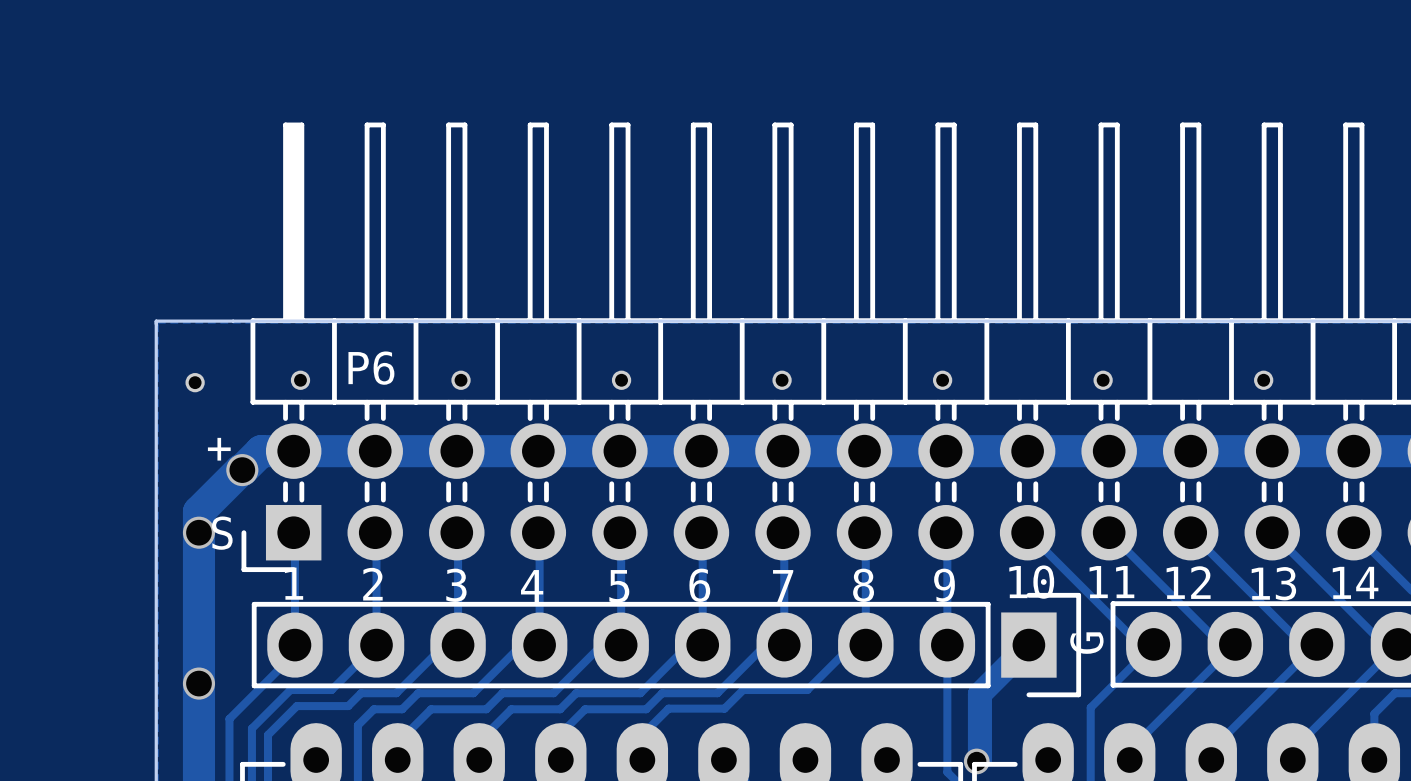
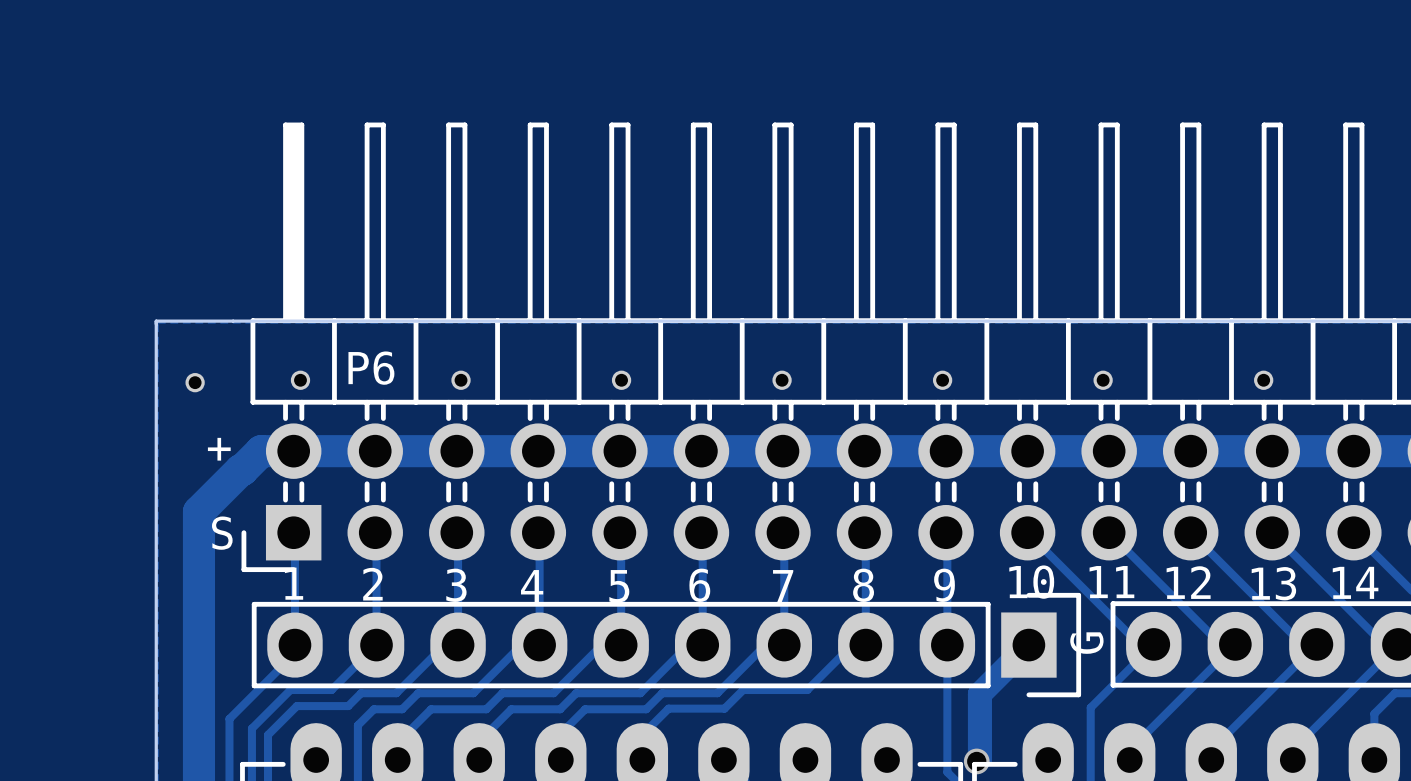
via: (242, 470) -> none
via: (198, 532) -> none
via: (198, 683) -> none

